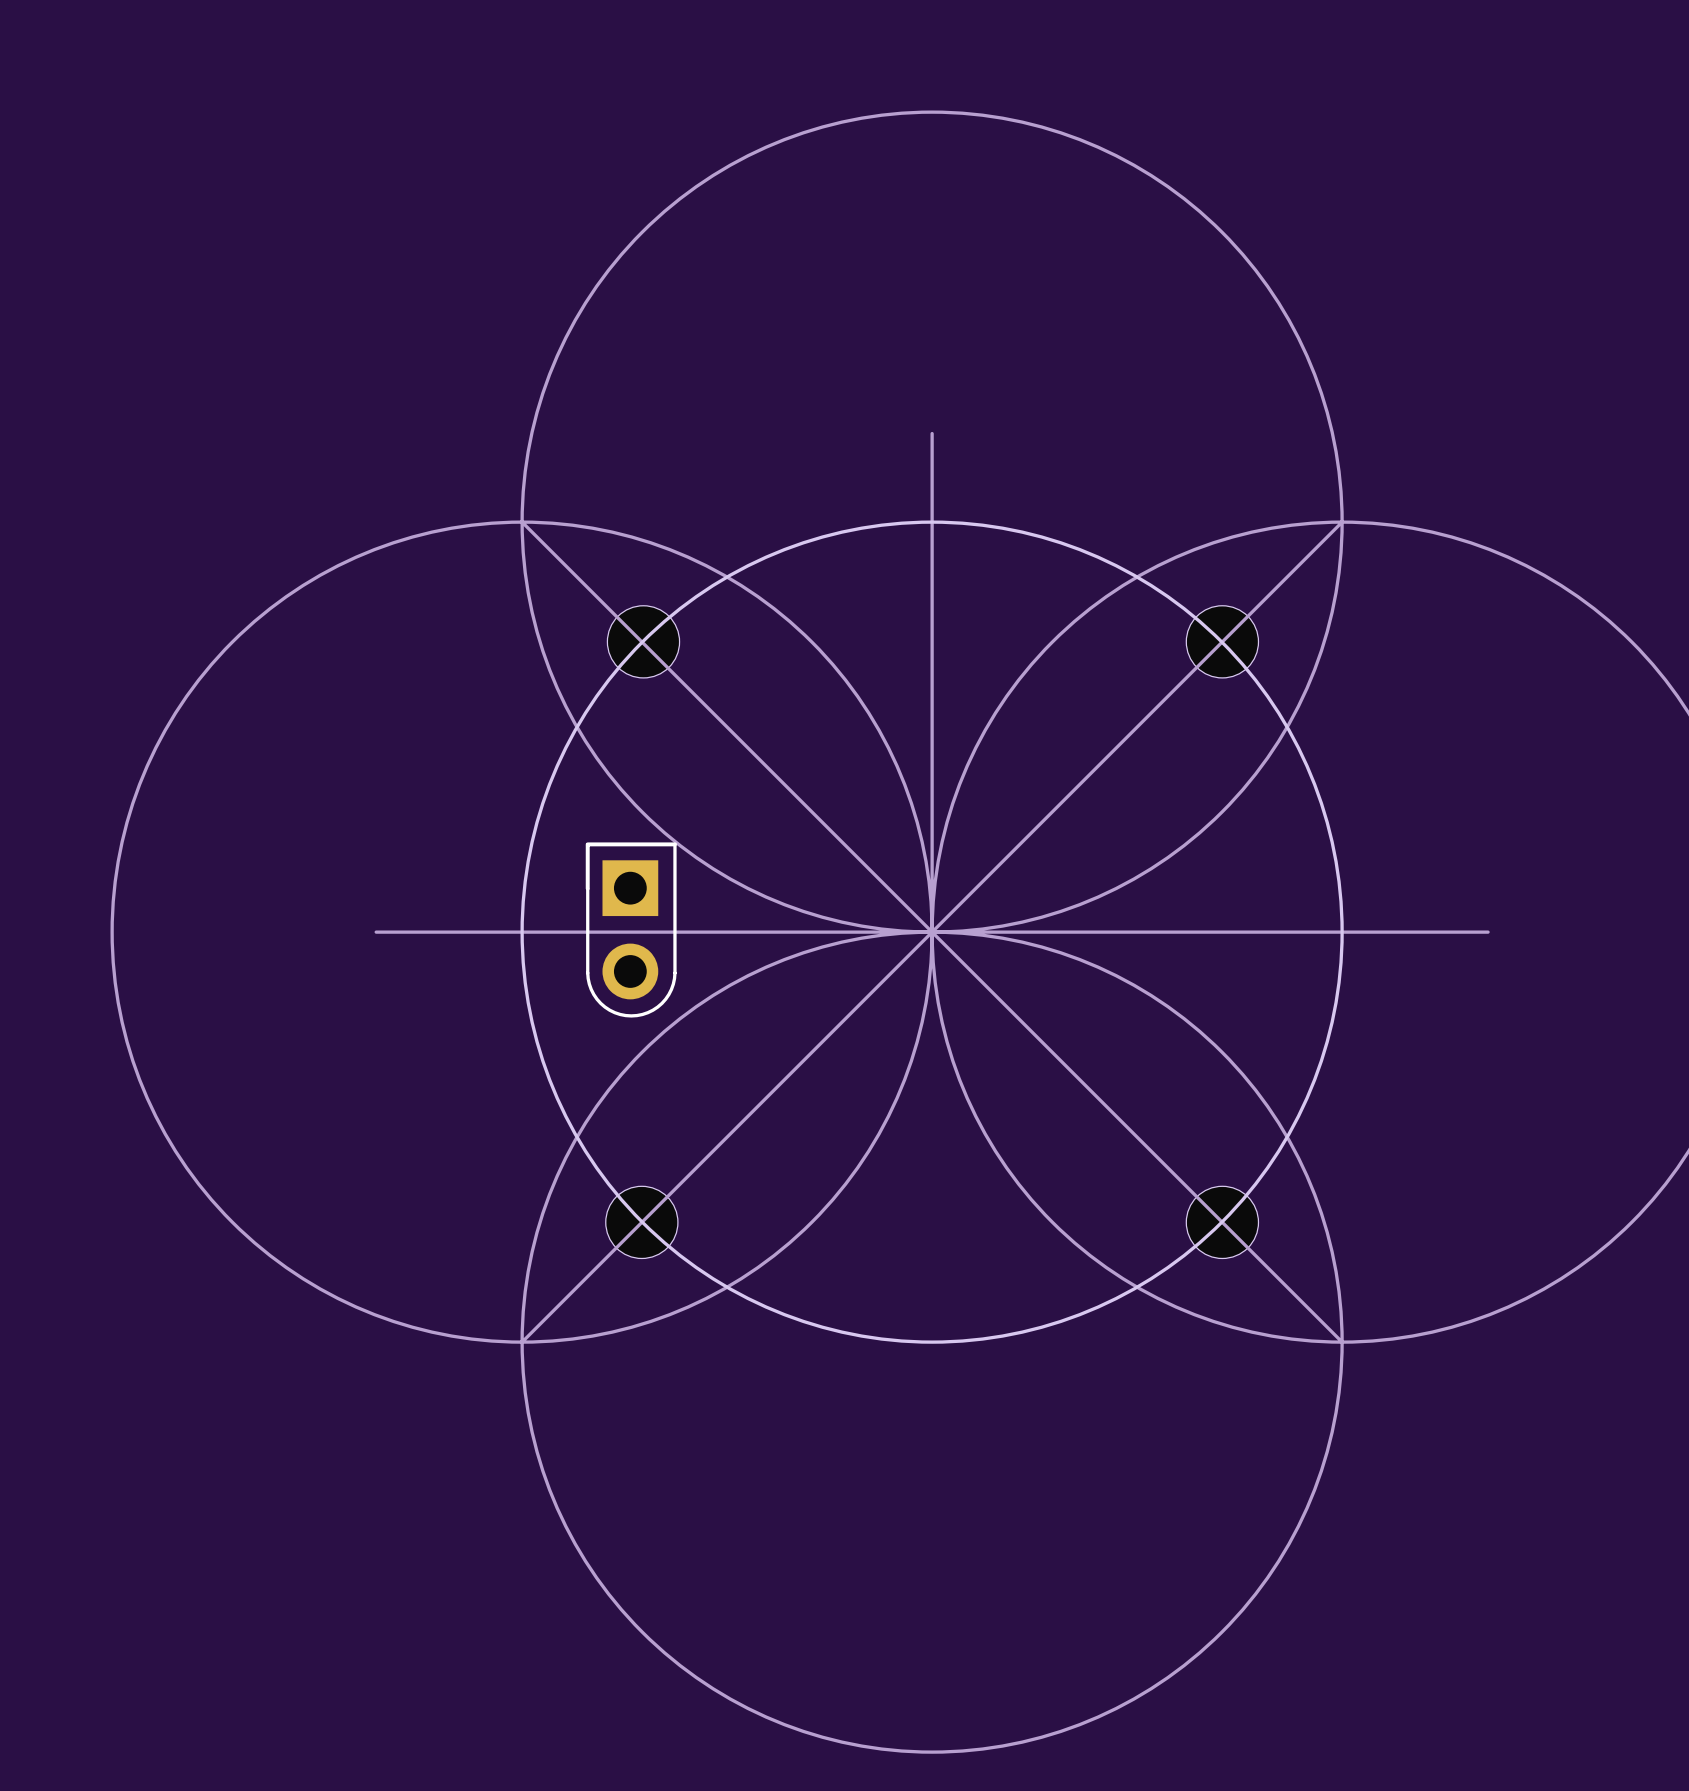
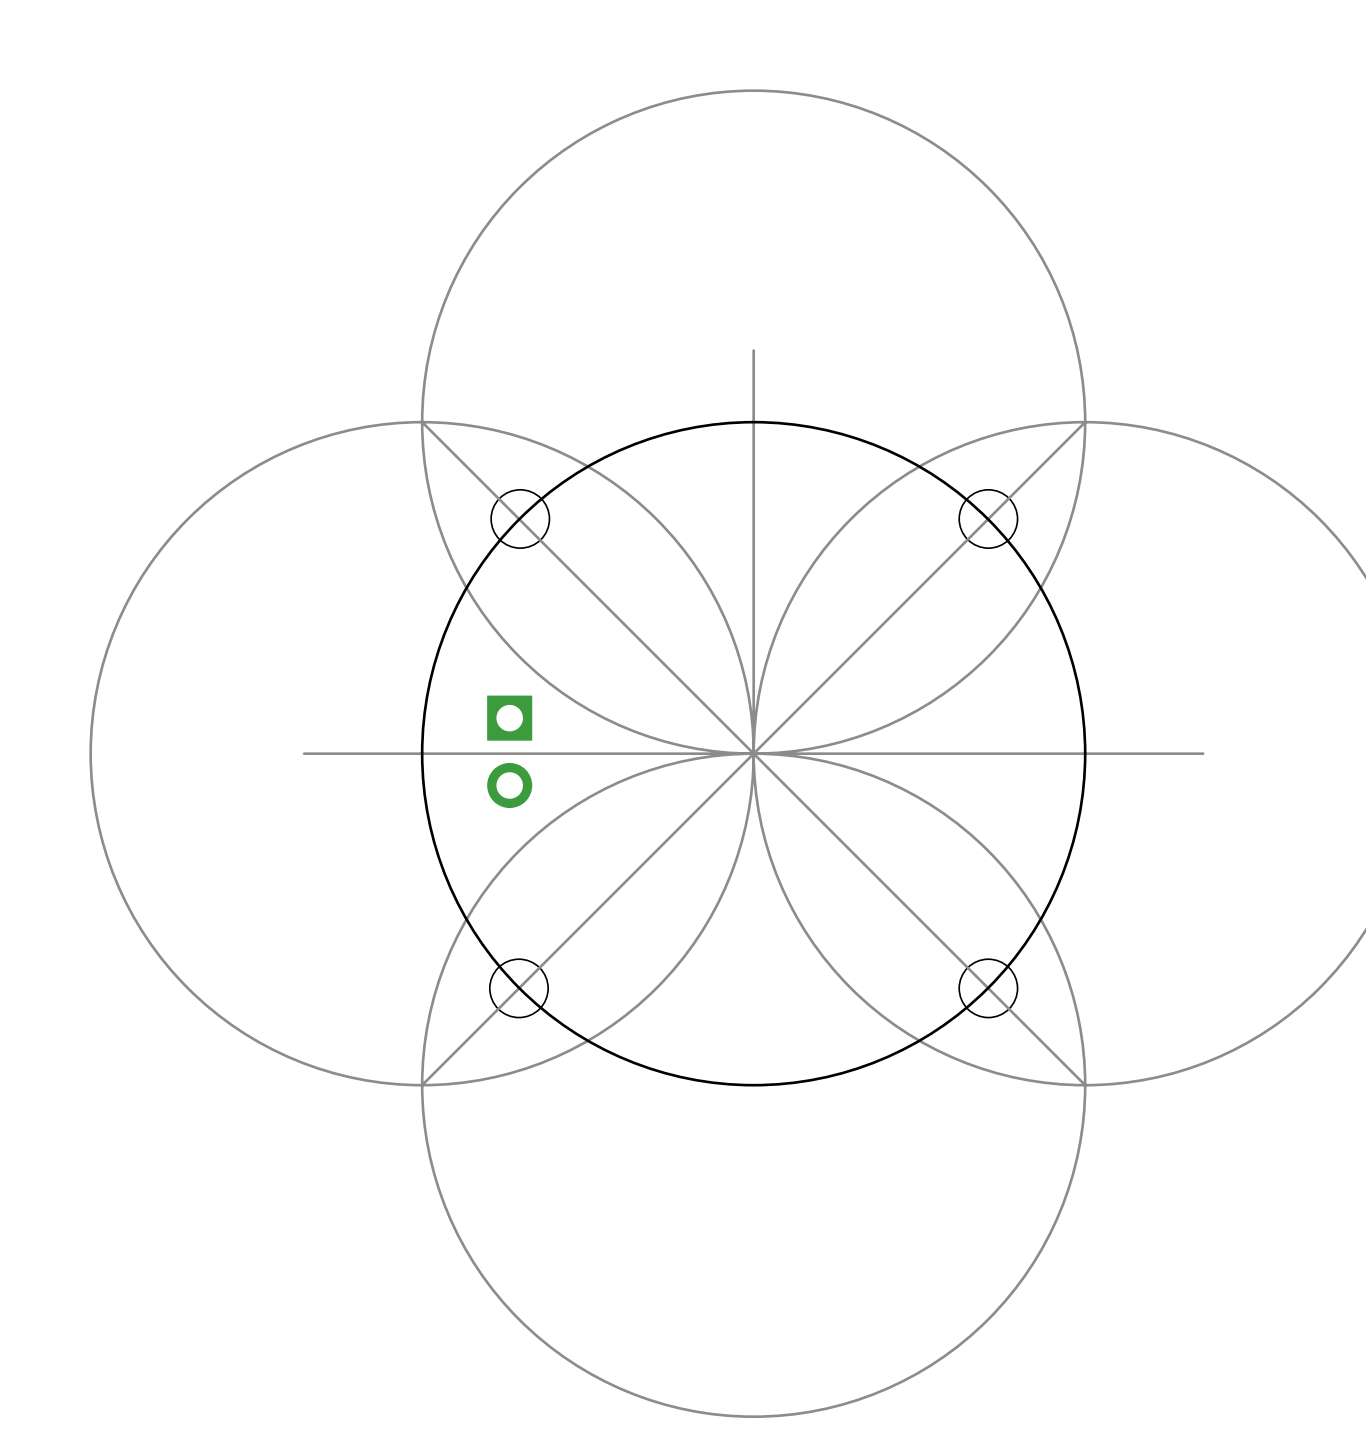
part footprint: [585, 842, 677, 1018] -> [487, 695, 533, 809]

